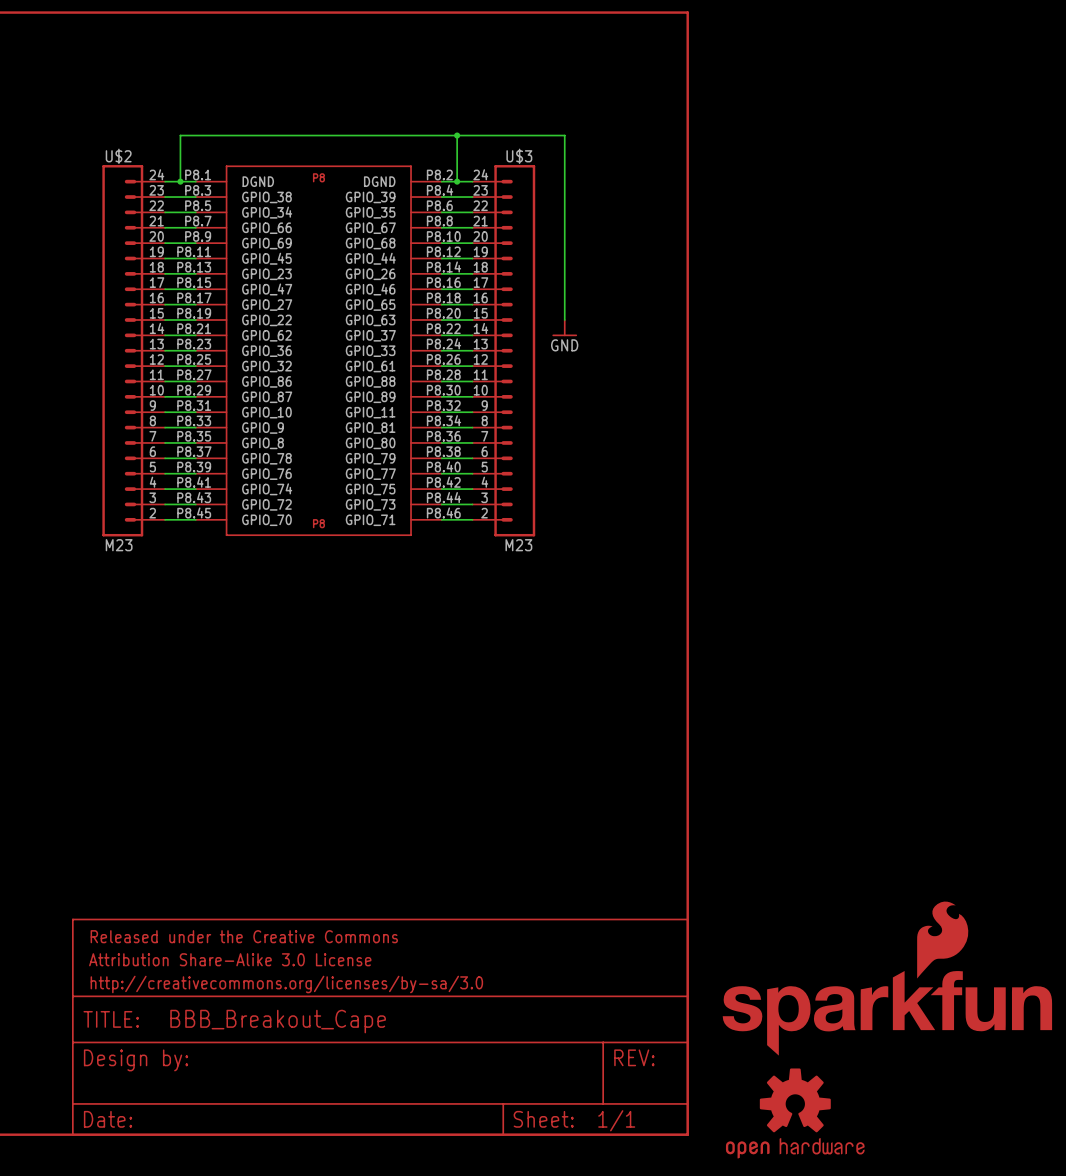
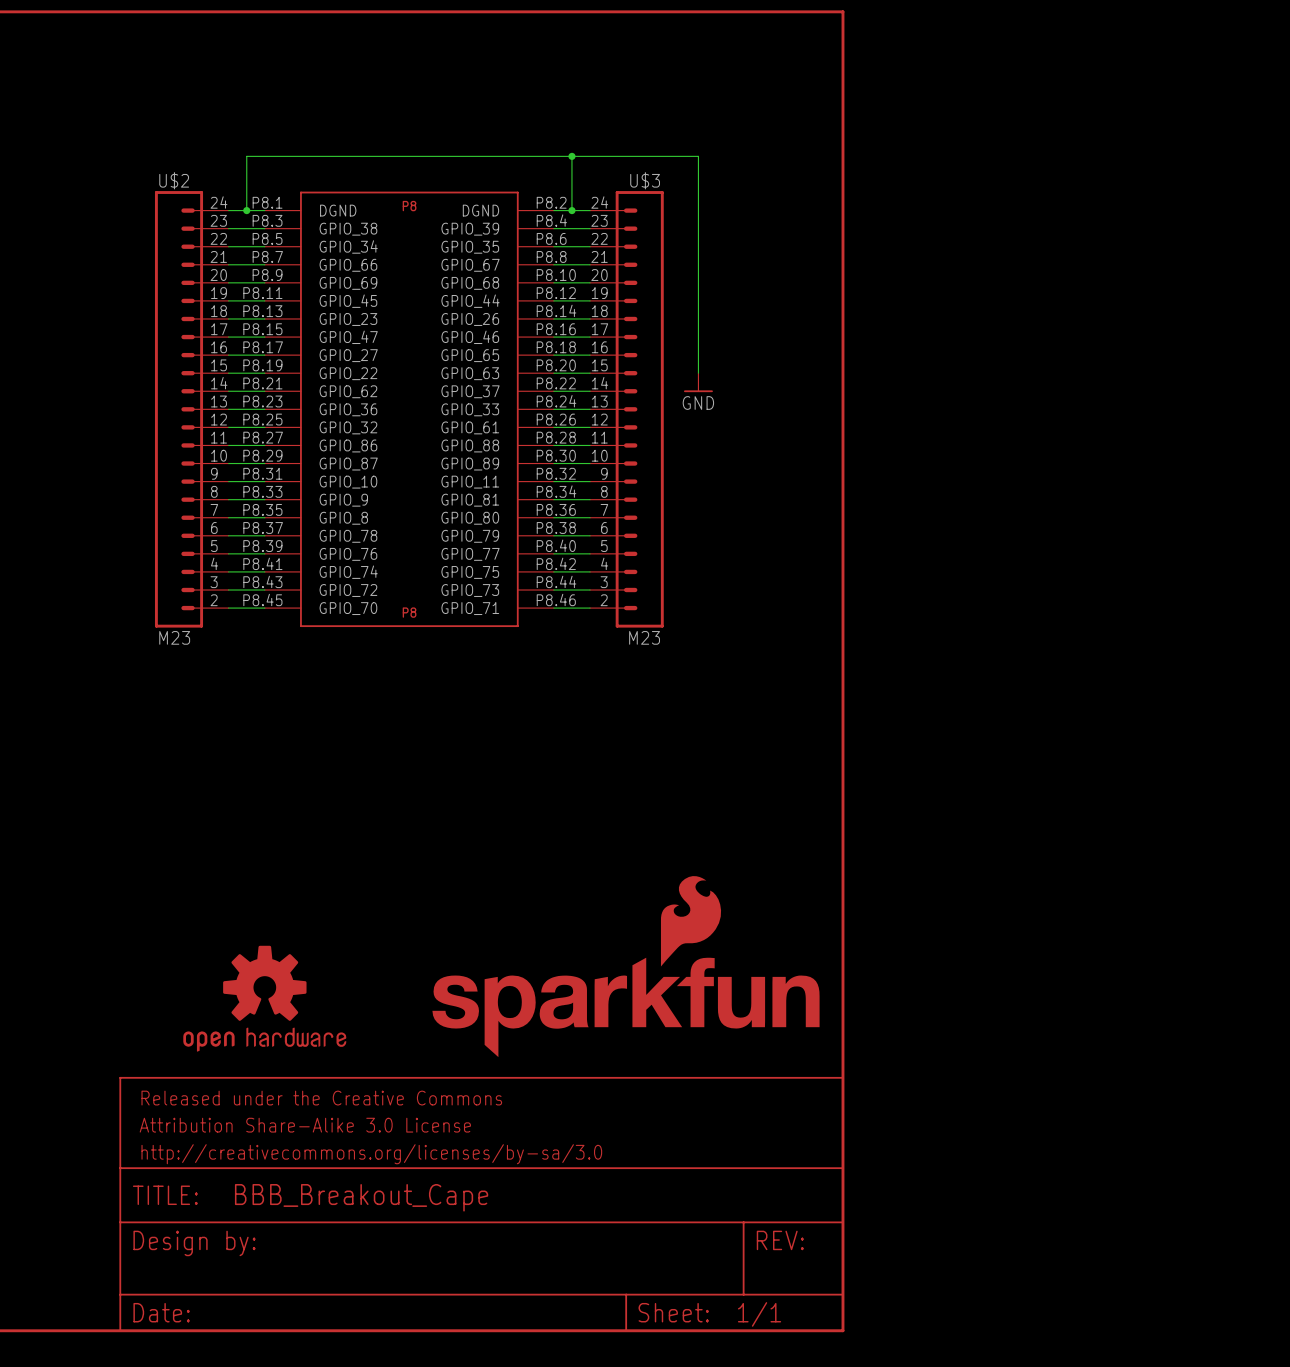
part: none -> (625, 966)
part: none -> (264, 998)
part: (887, 978) -> none
part: (795, 1113) -> none

